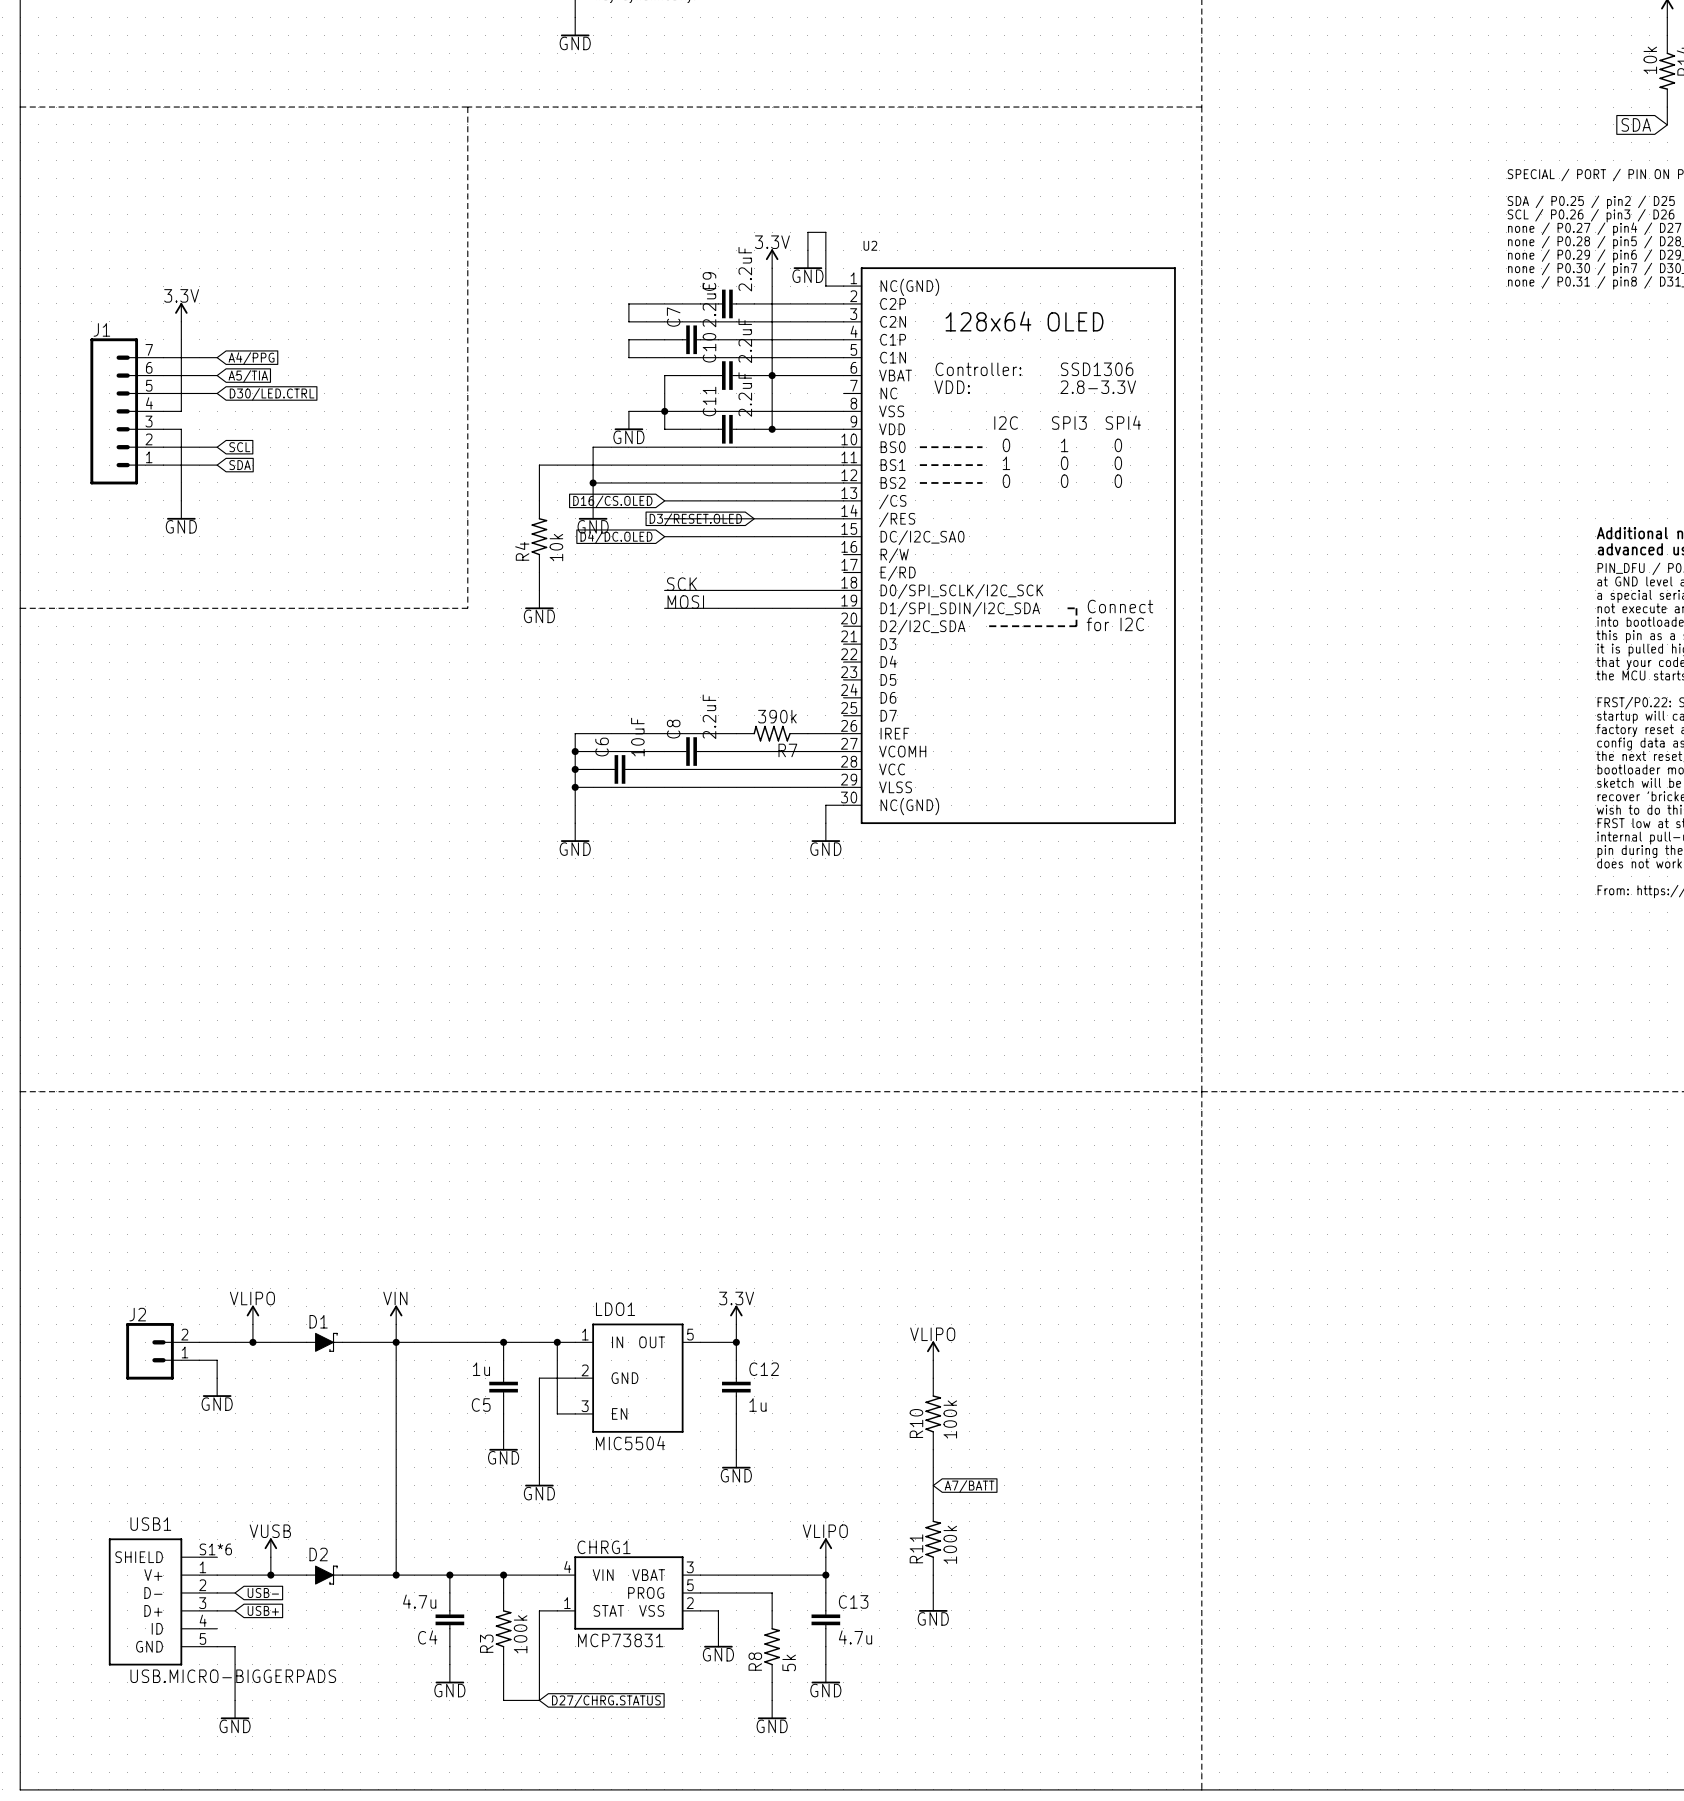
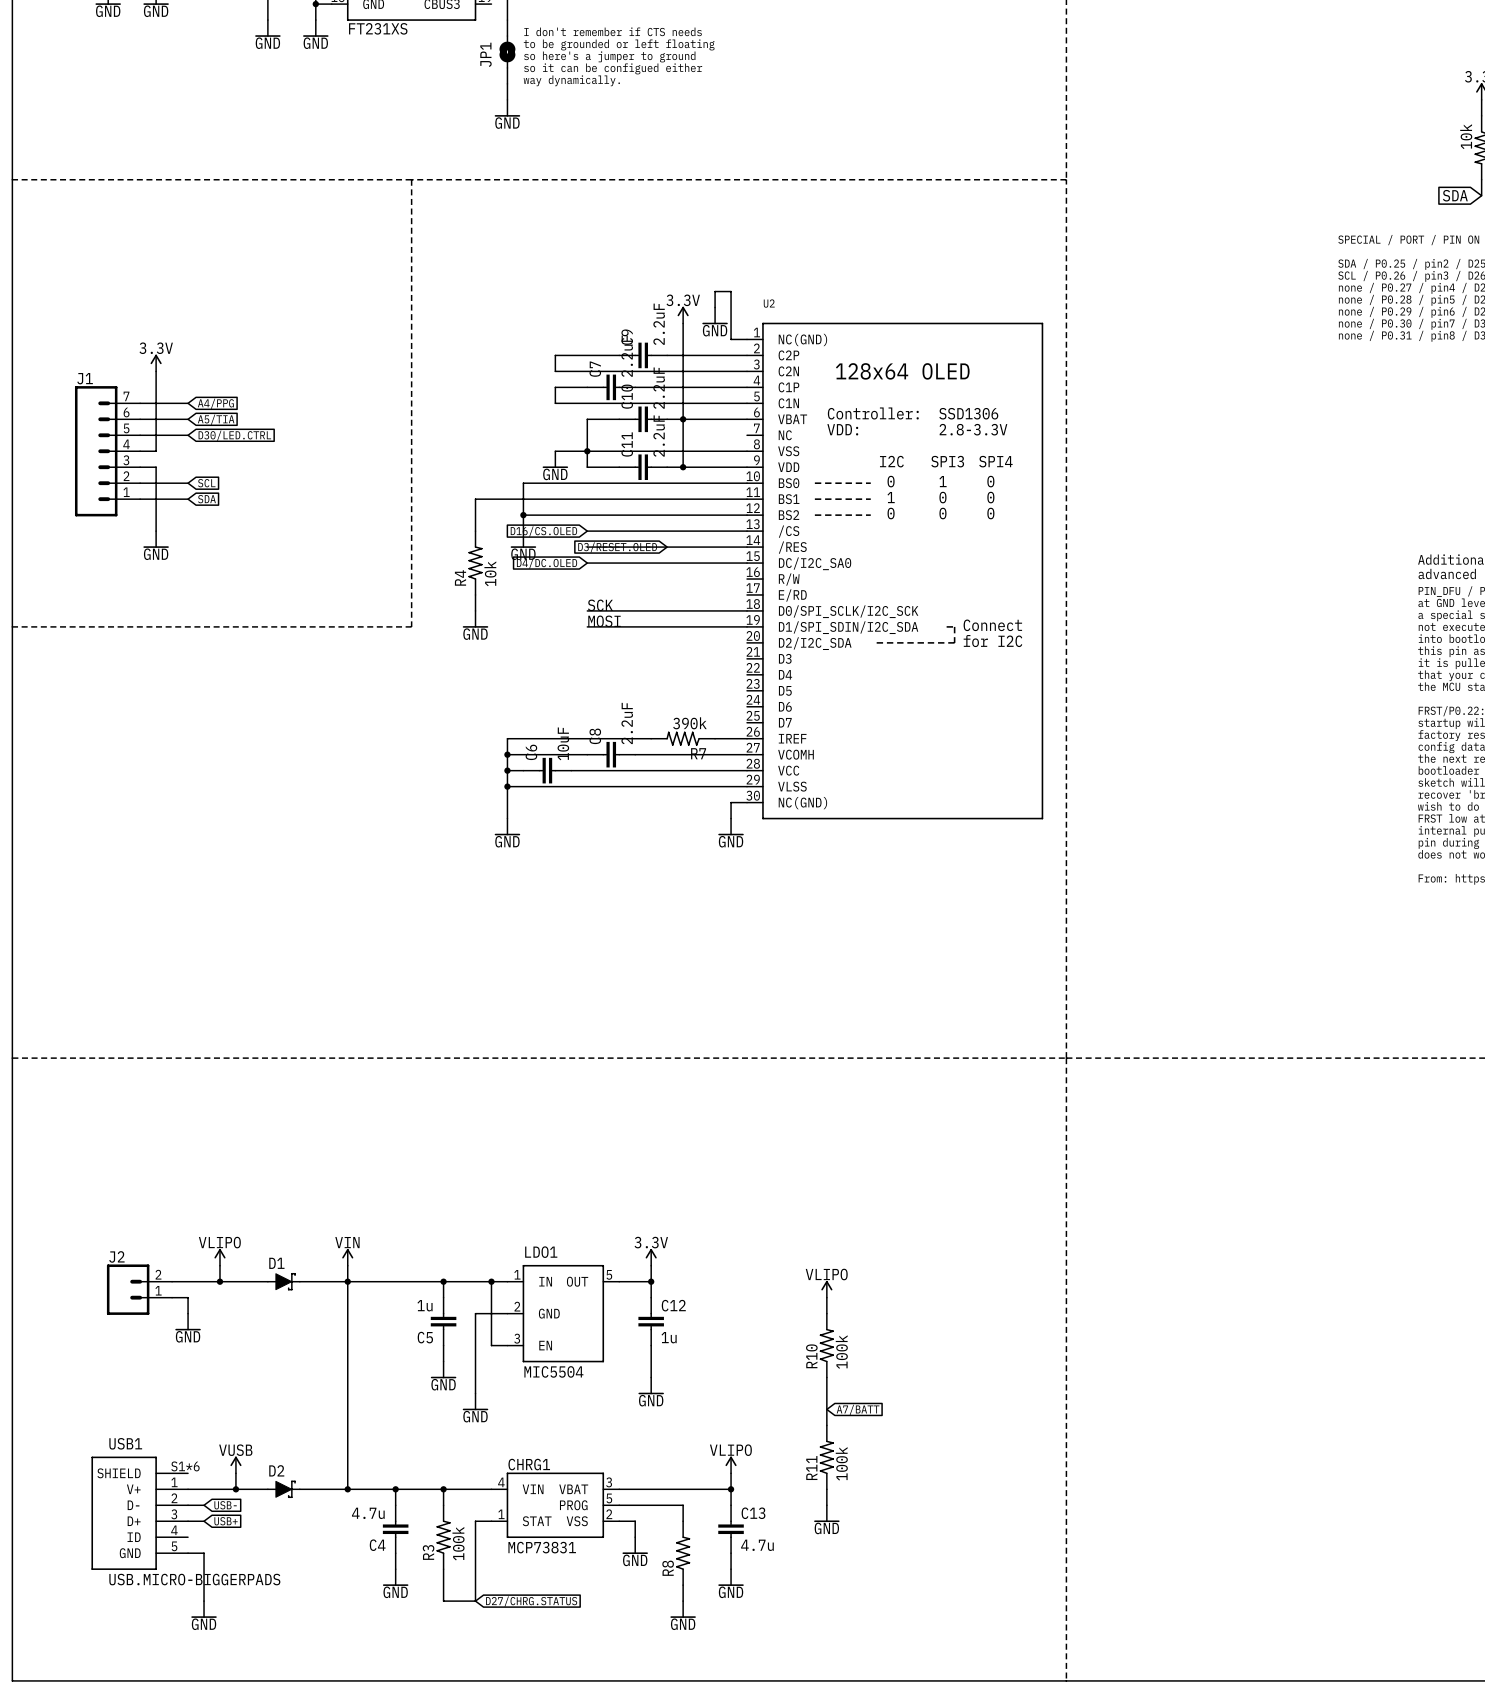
R8 value: 5k (789, 1662) -> none

